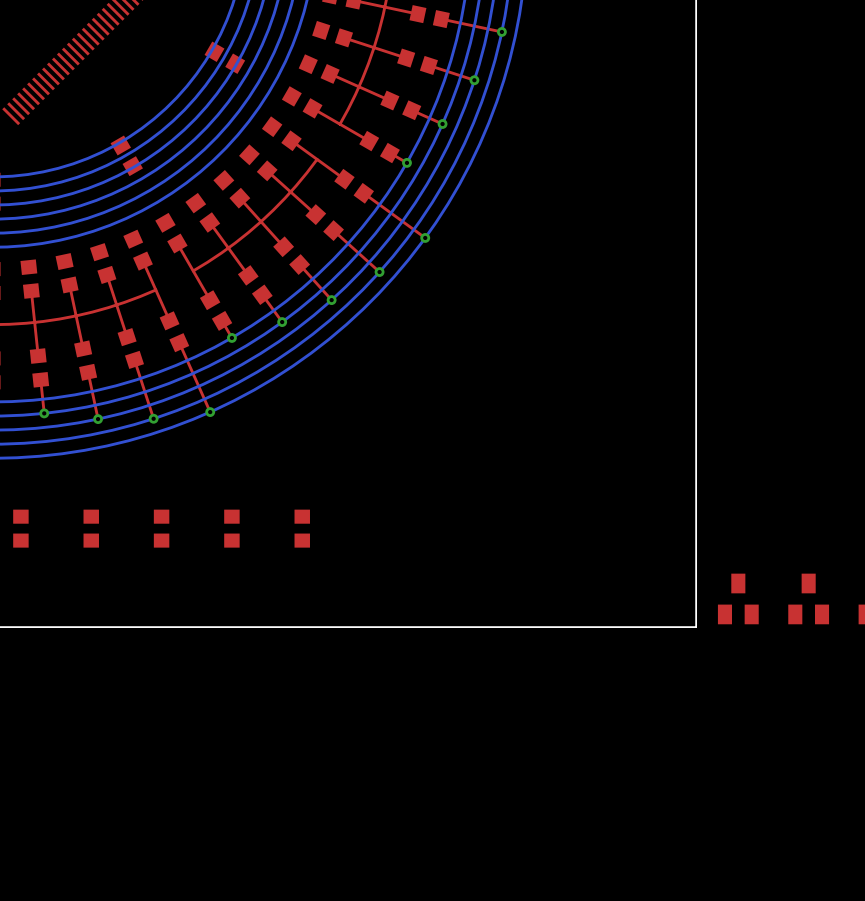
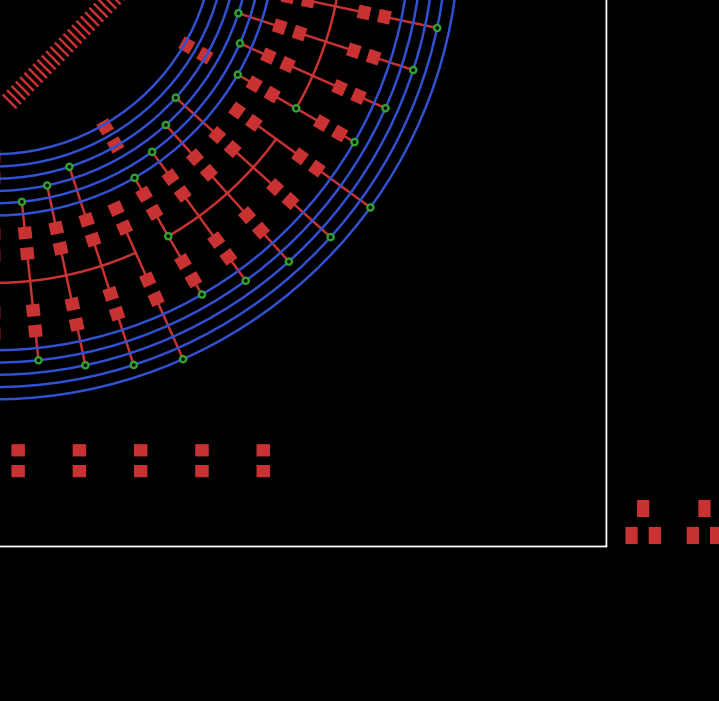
top track: none -> (238, 13) (279, 26)
via: none -> (238, 13)
top track: none -> (239, 43) (268, 56)
via: none -> (239, 43)
top track: none -> (237, 74) (254, 84)
via: none -> (237, 74)
top track: none -> (175, 97) (217, 135)
via: none -> (175, 97)
via: none -> (296, 108)
top track: none -> (165, 124) (194, 157)
via: none -> (165, 124)
top track: none -> (152, 151) (170, 177)
via: none -> (152, 151)
top track: none -> (69, 166) (86, 219)
via: none -> (69, 166)
top track: none -> (134, 177) (144, 194)
via: none -> (134, 177)
top track: none -> (47, 185) (56, 228)
via: none -> (47, 185)
top track: none -> (21, 201) (25, 232)
via: none -> (21, 201)
via: none -> (168, 236)

